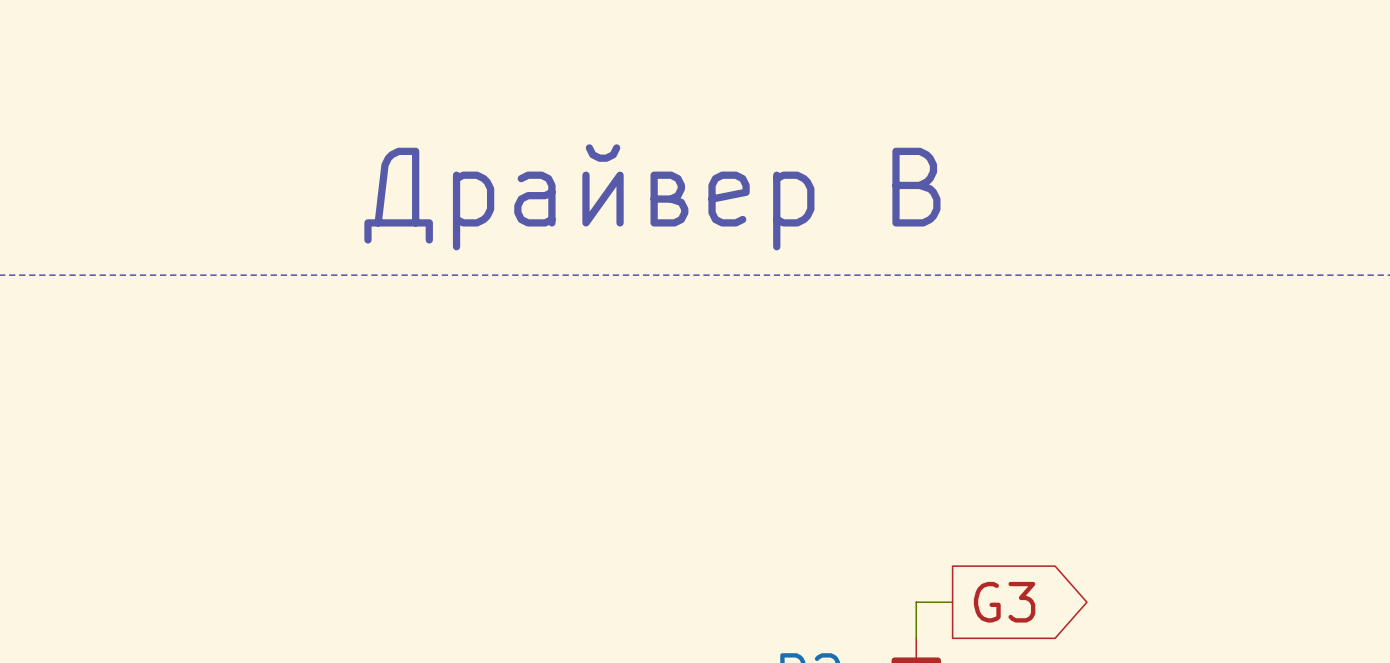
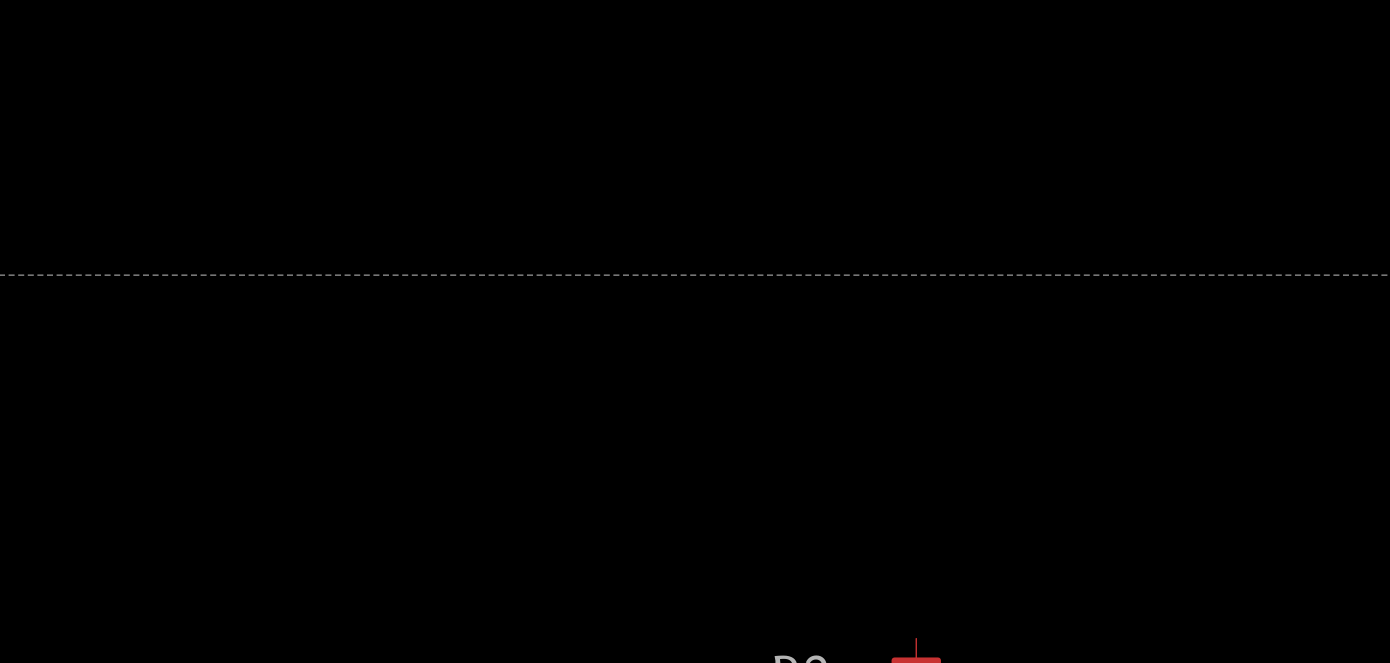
text: Драйвер В (652, 197) -> none
wire: (952, 602) (916, 602) (916, 638) -> none
global label: G3 (1004, 602) -> none

